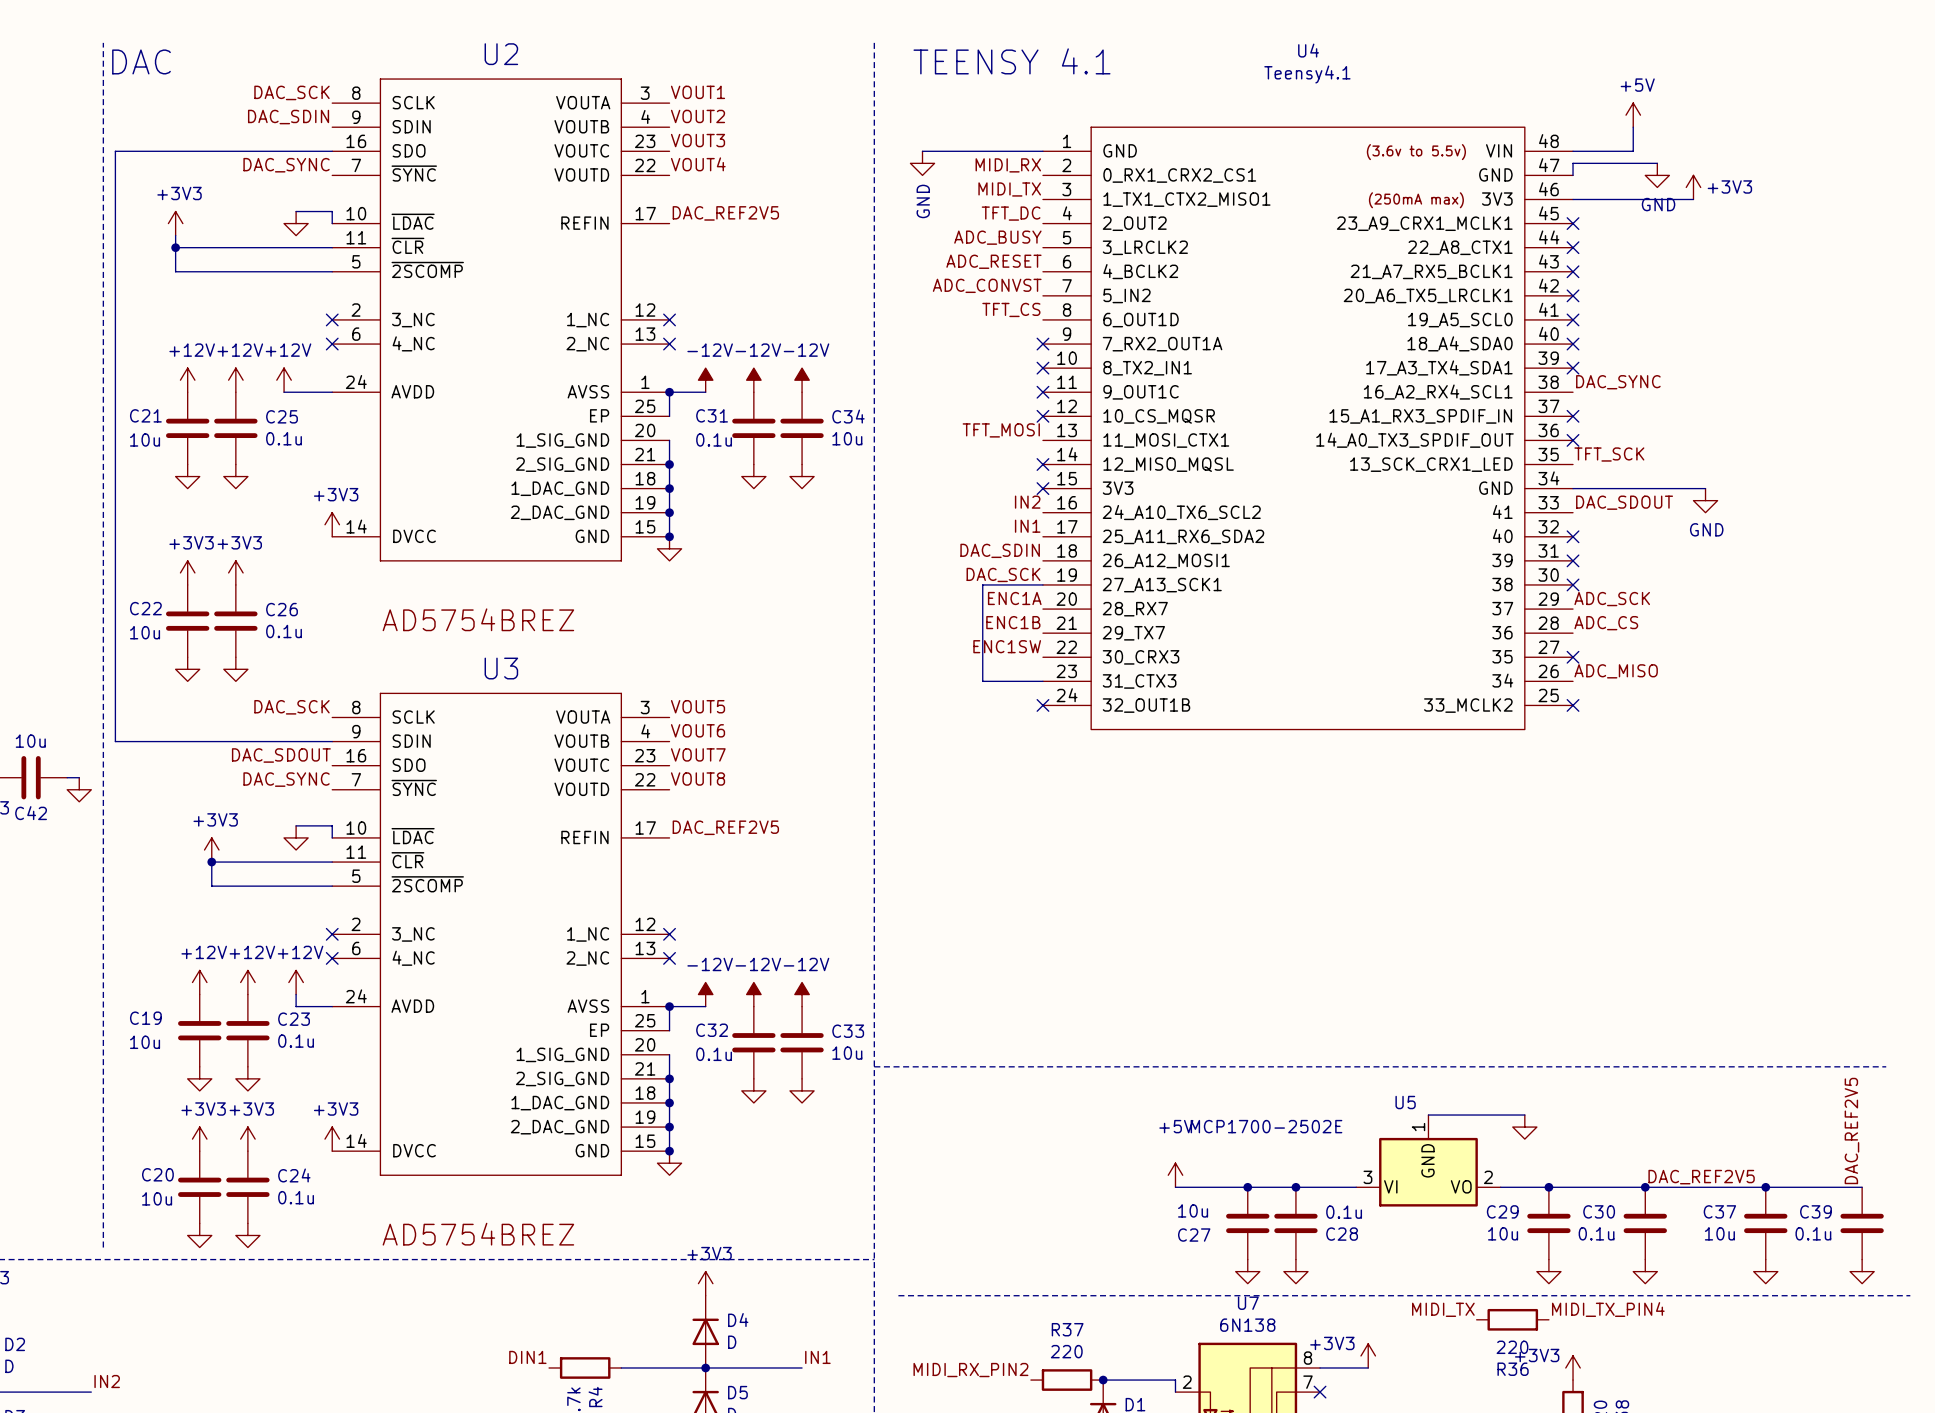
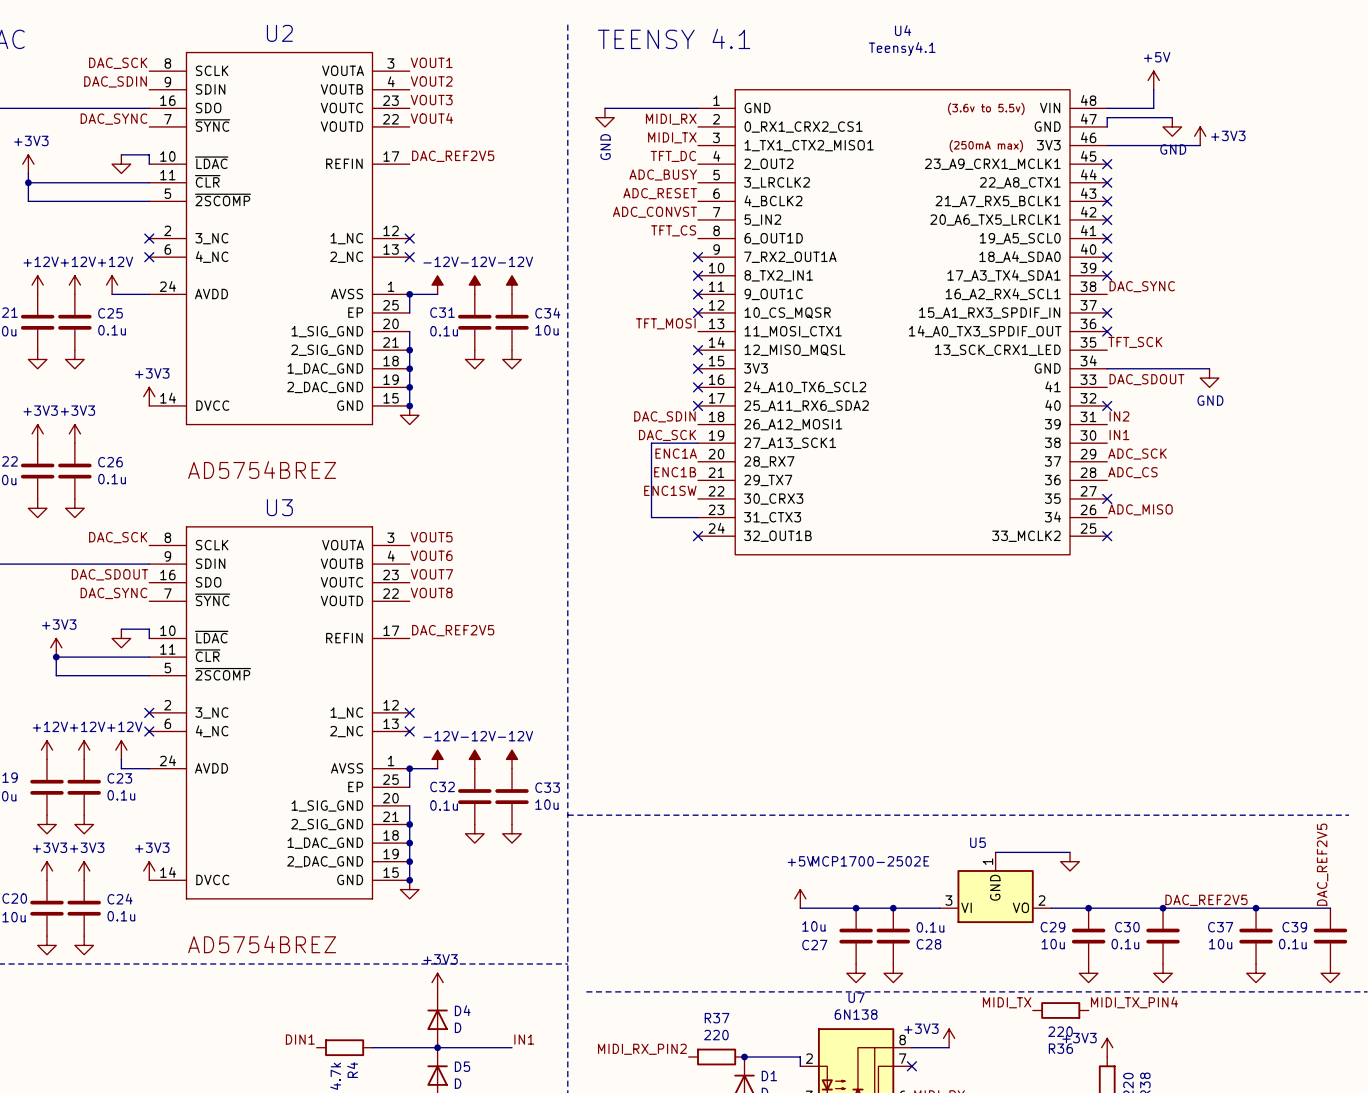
label: IN2 (1027, 502) -> none
no-connect mark: none -> (698, 387)
label: IN1 (1027, 526) -> none
no-connect mark: none -> (698, 405)
label: none -> IN2 (1119, 416)
no-connect mark: (1573, 560) -> none
label: none -> IN1 (1119, 435)
no-connect mark: (1573, 584) -> none

